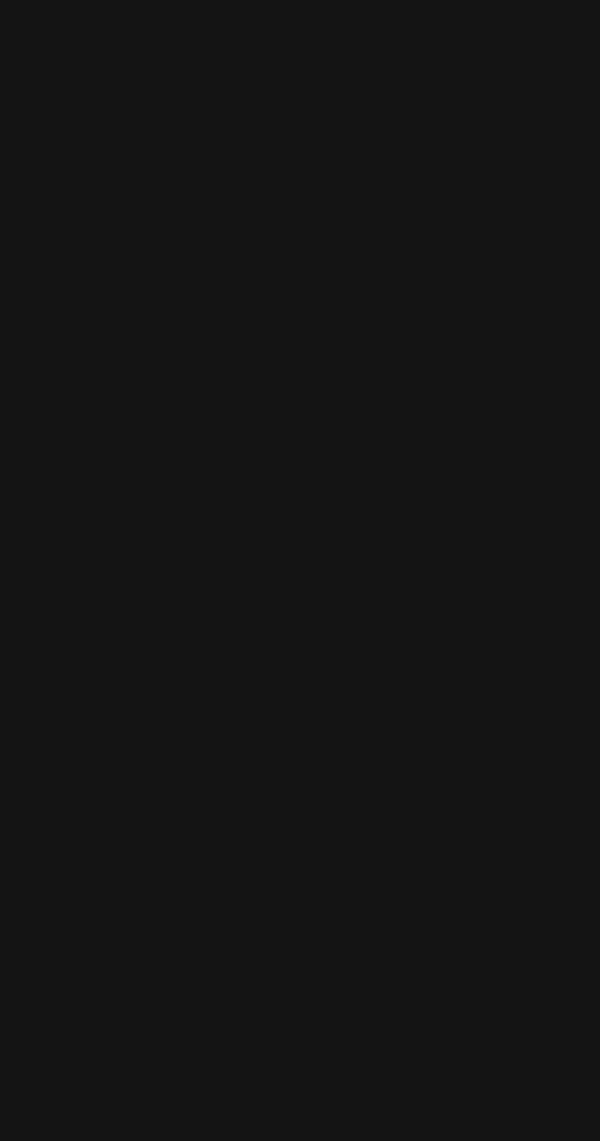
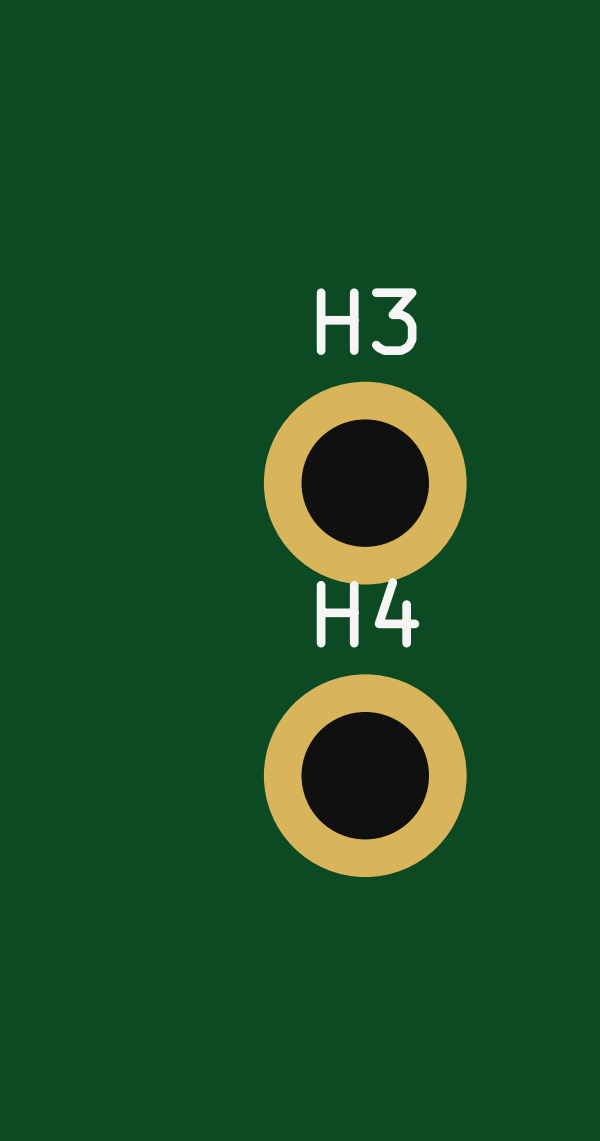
H3: none -> (365, 483)
H4: none -> (365, 775)

